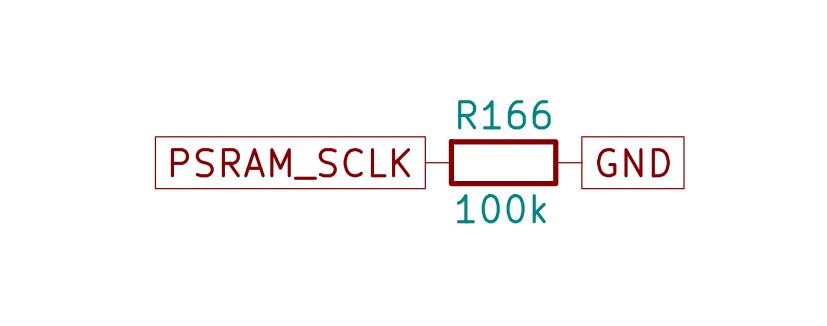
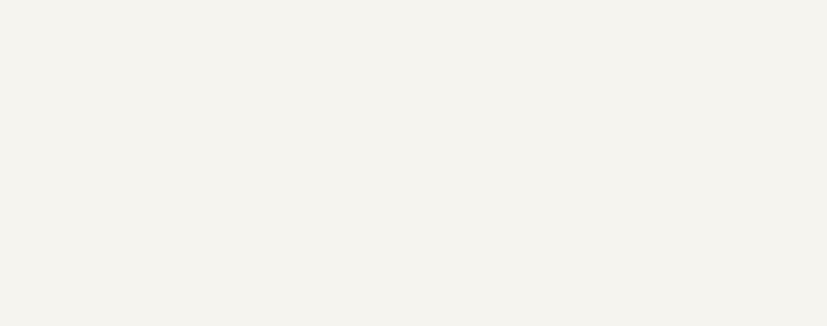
R166: 100k (503, 162) -> none
global label: GND (633, 162) -> none
global label: PSRAM_SCLK (290, 163) -> none

